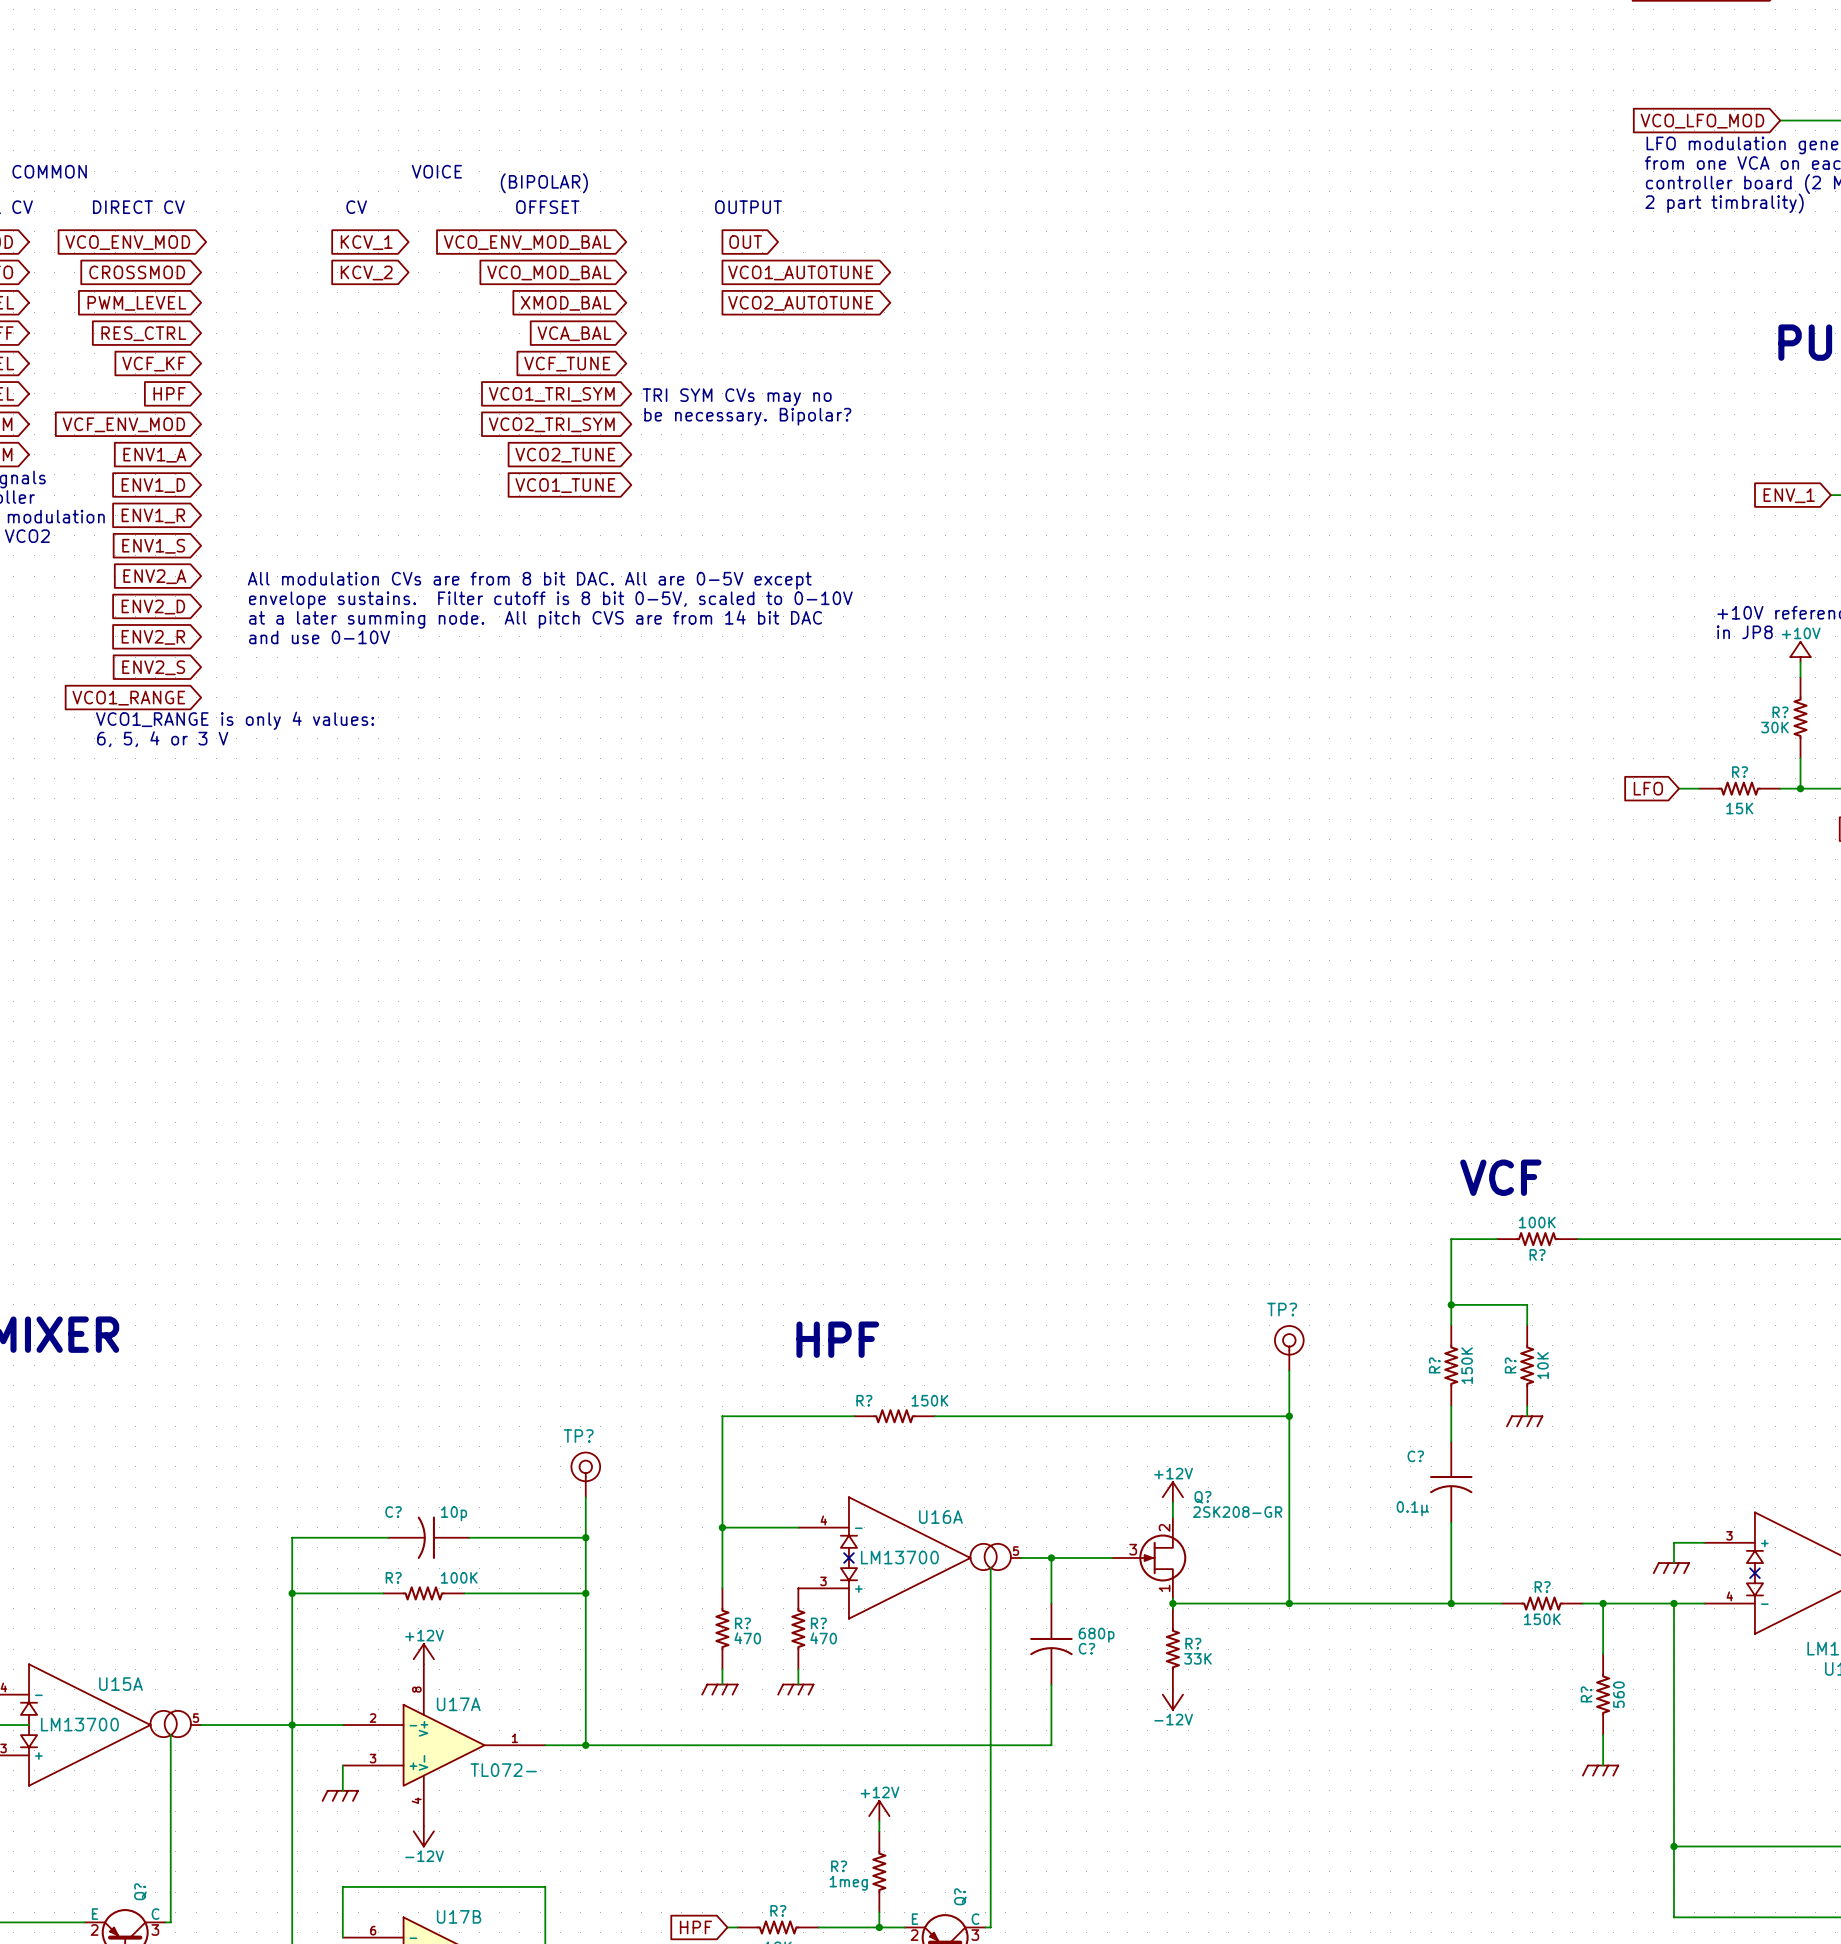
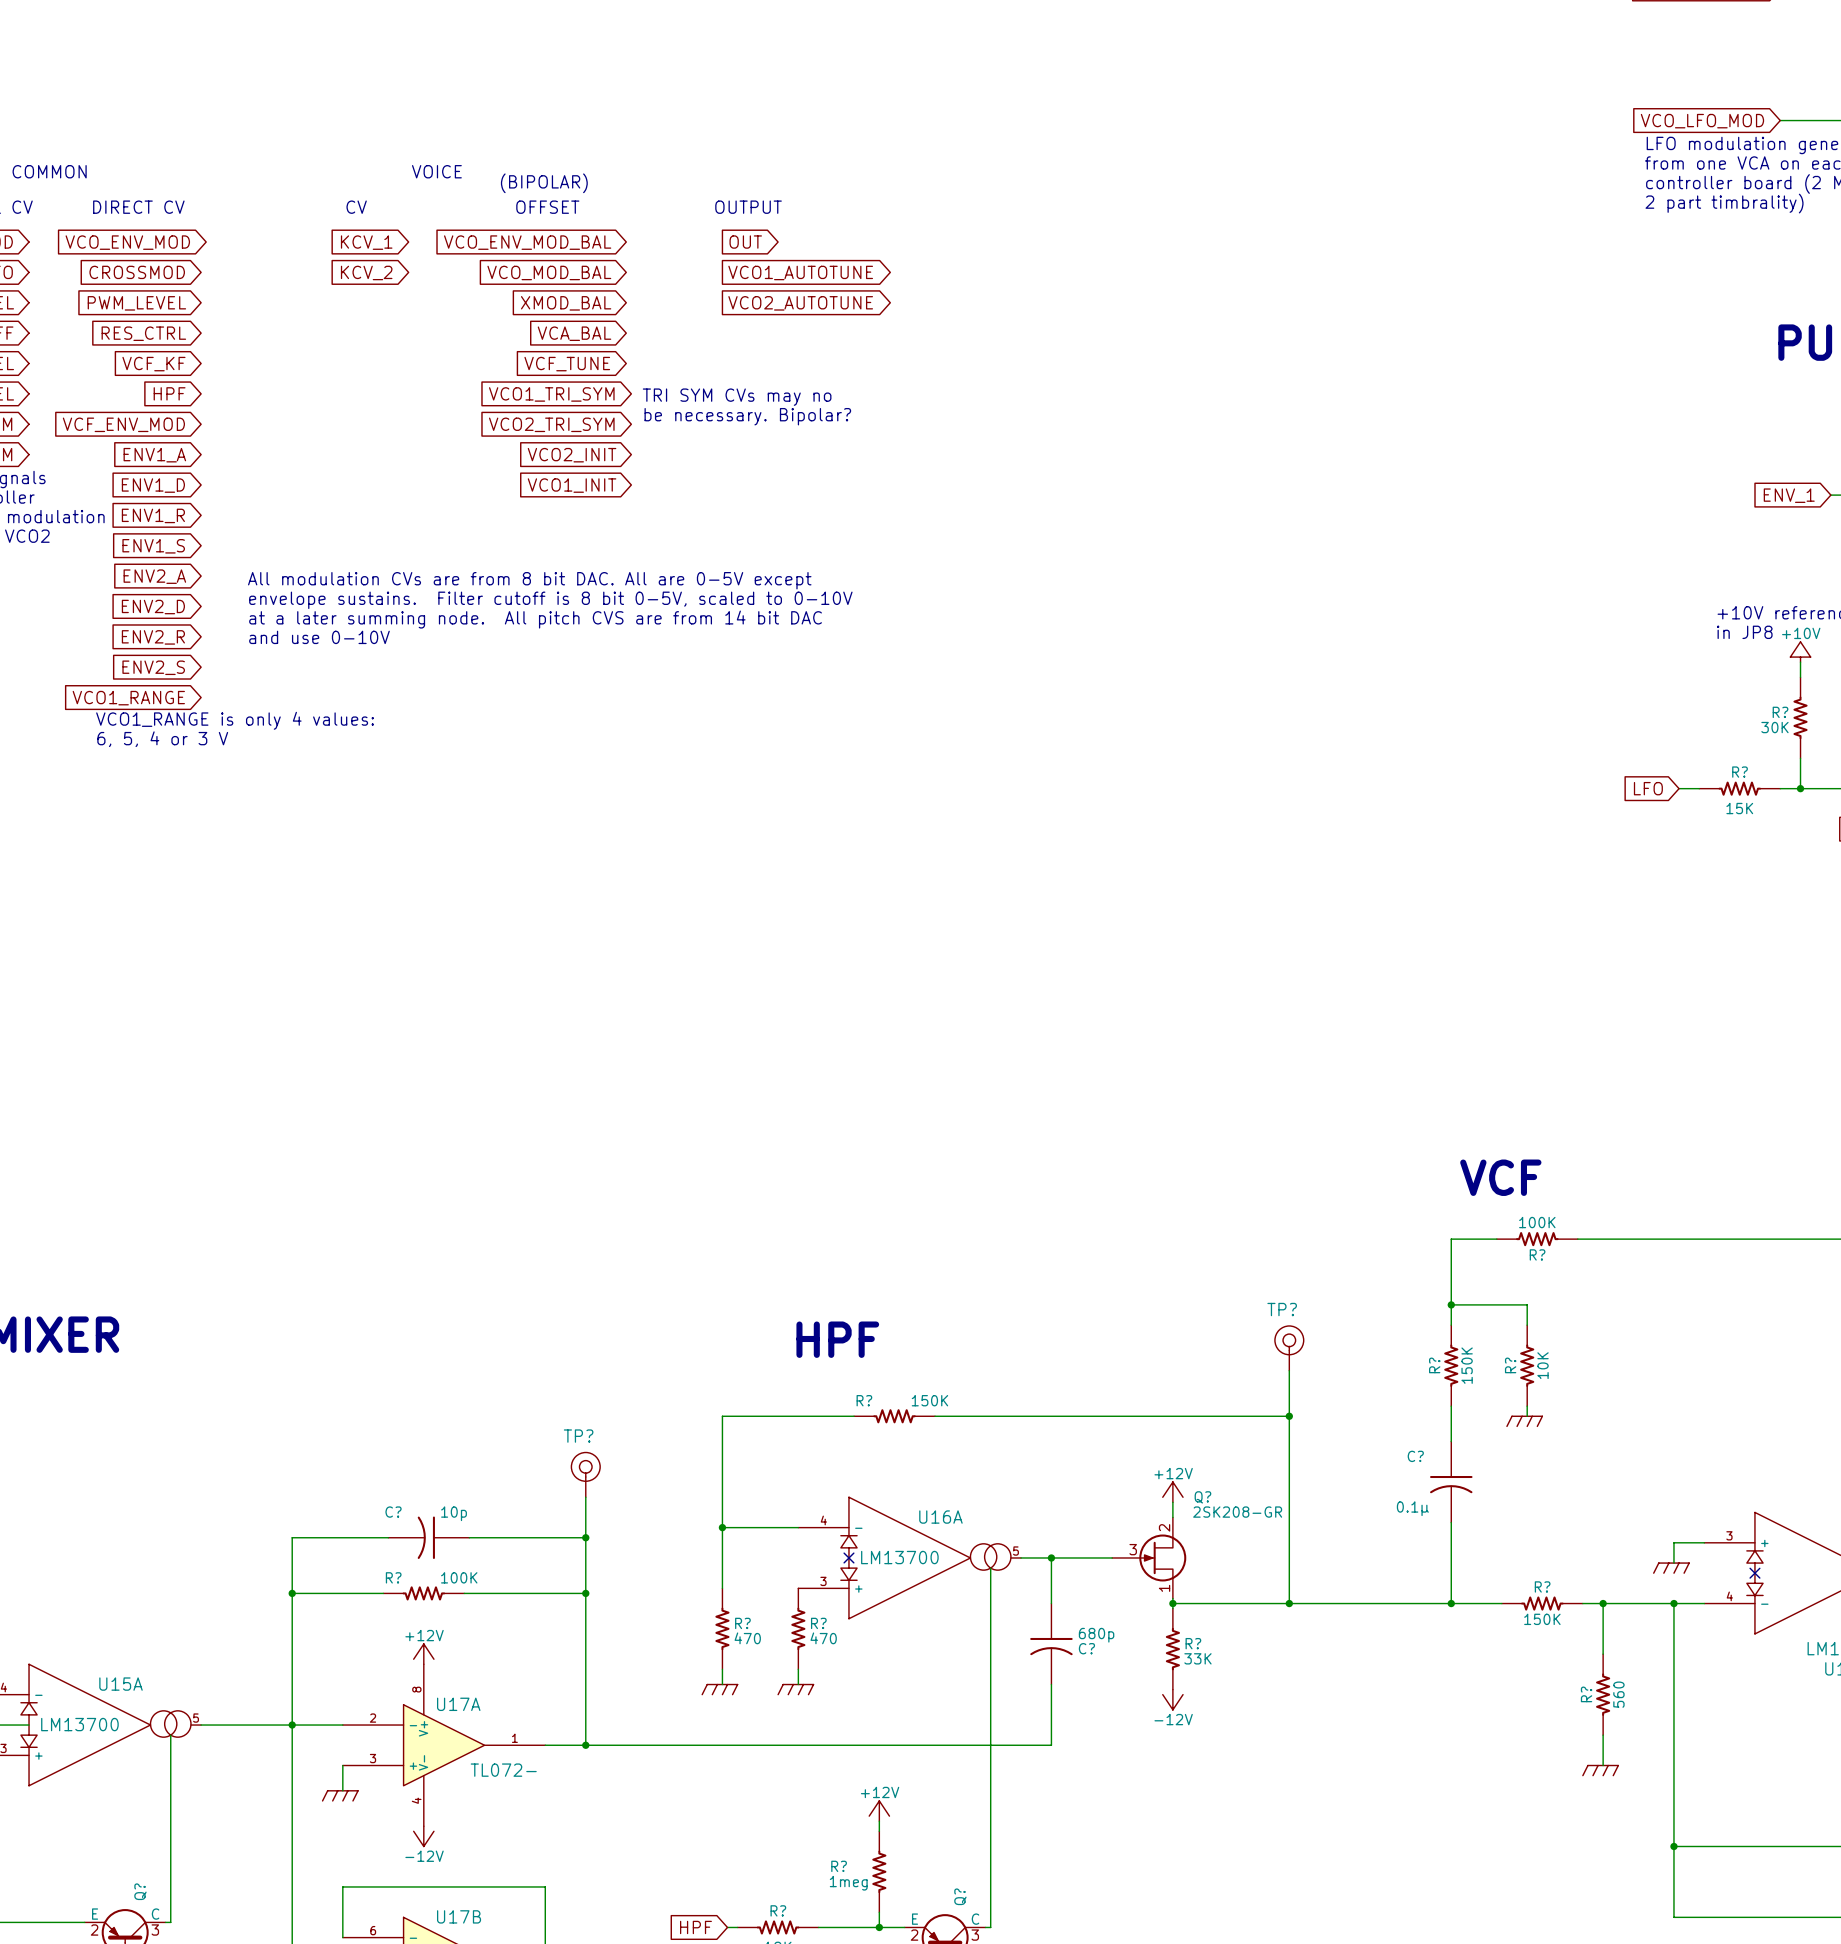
global label: VCO2_TUNE (565, 455) -> VCO2_INIT (572, 455)
global label: VCO1_TUNE (565, 485) -> VCO1_INIT (572, 485)

